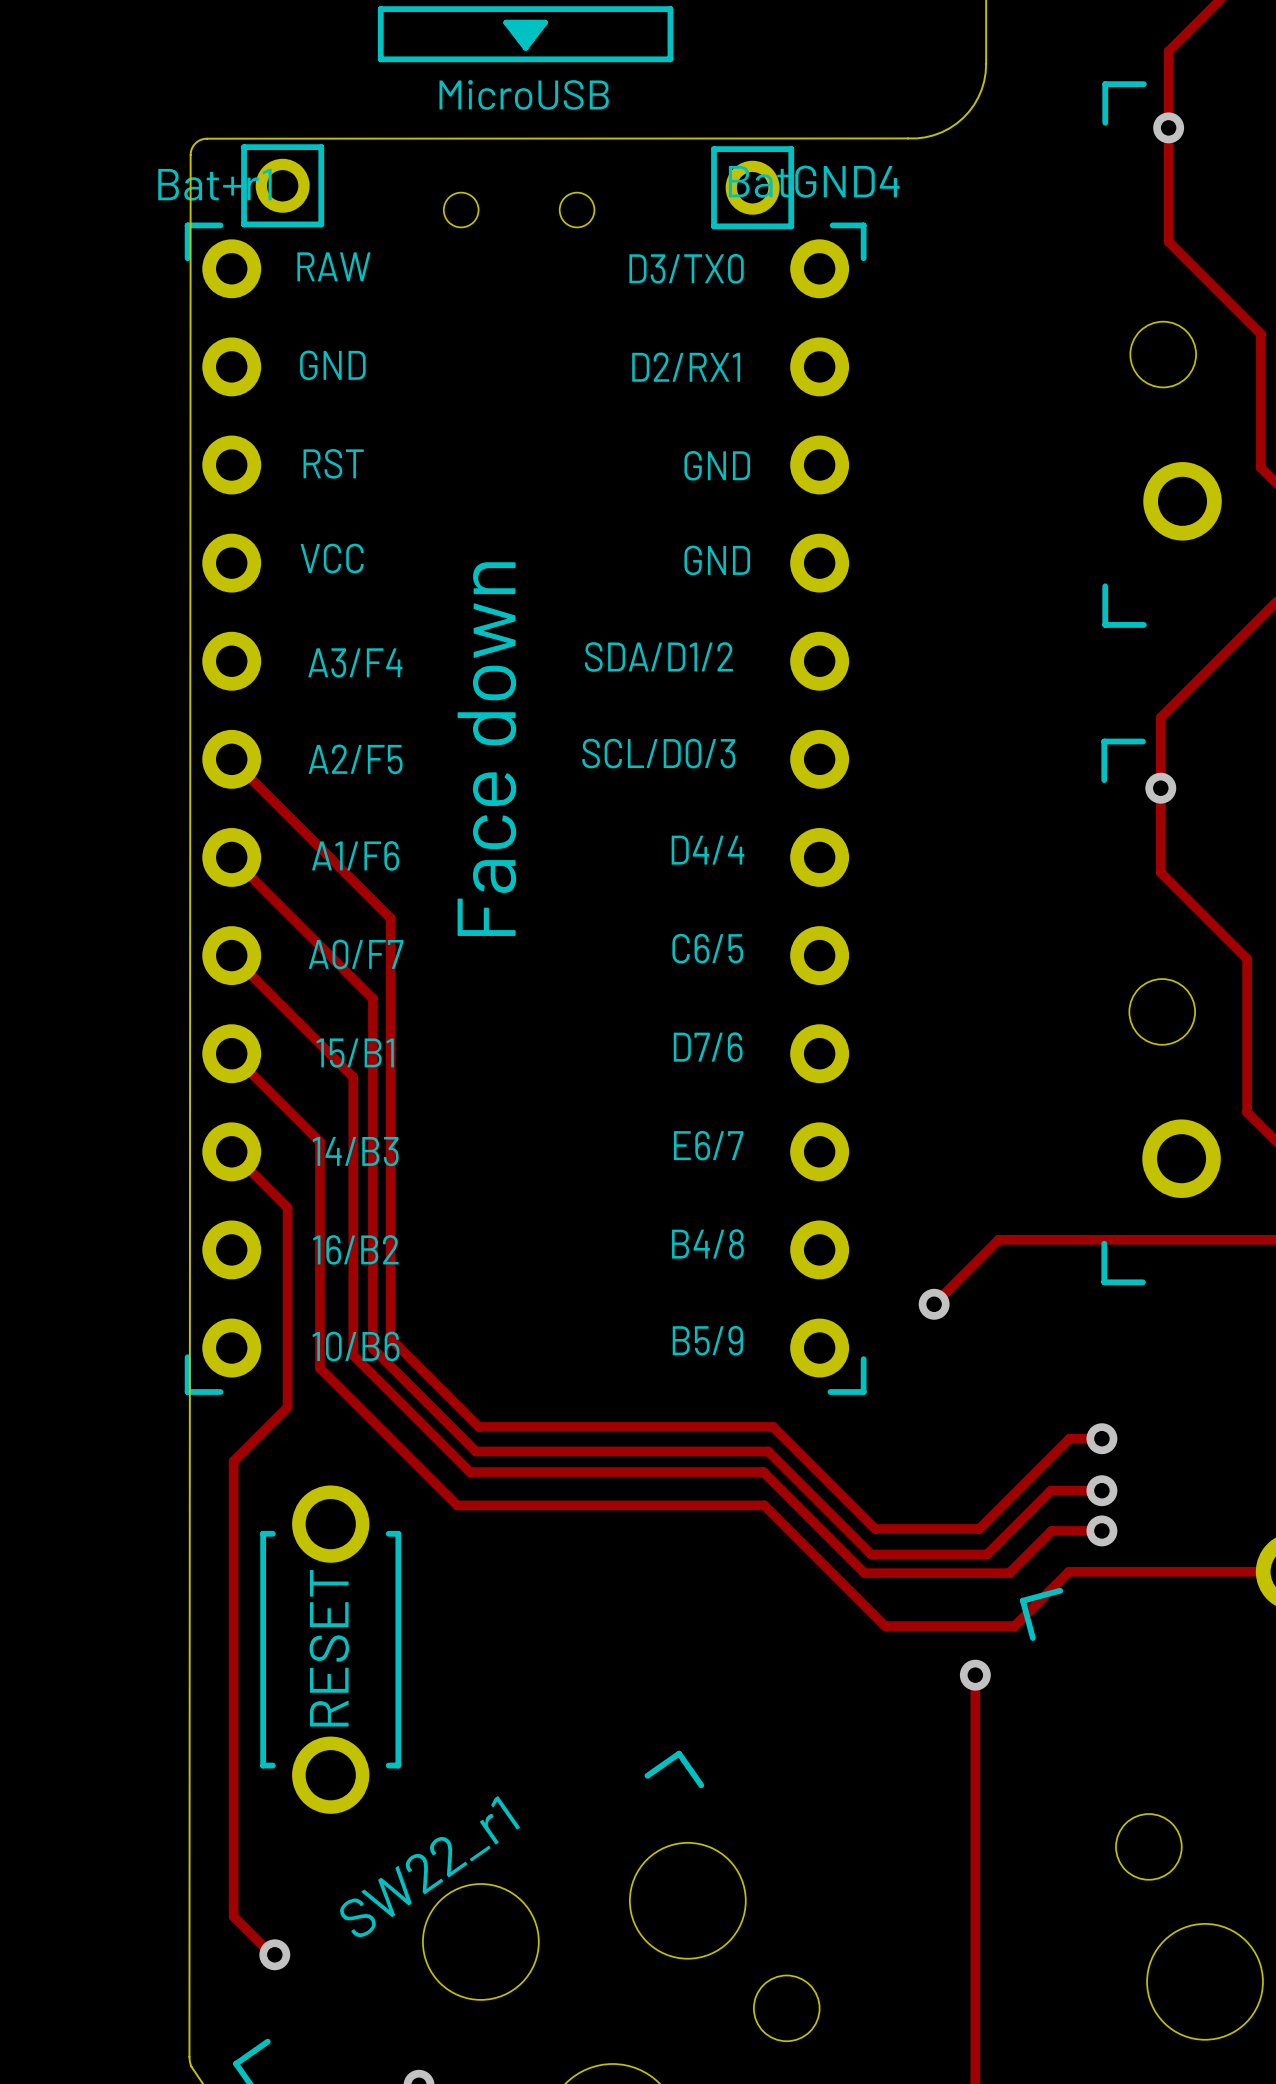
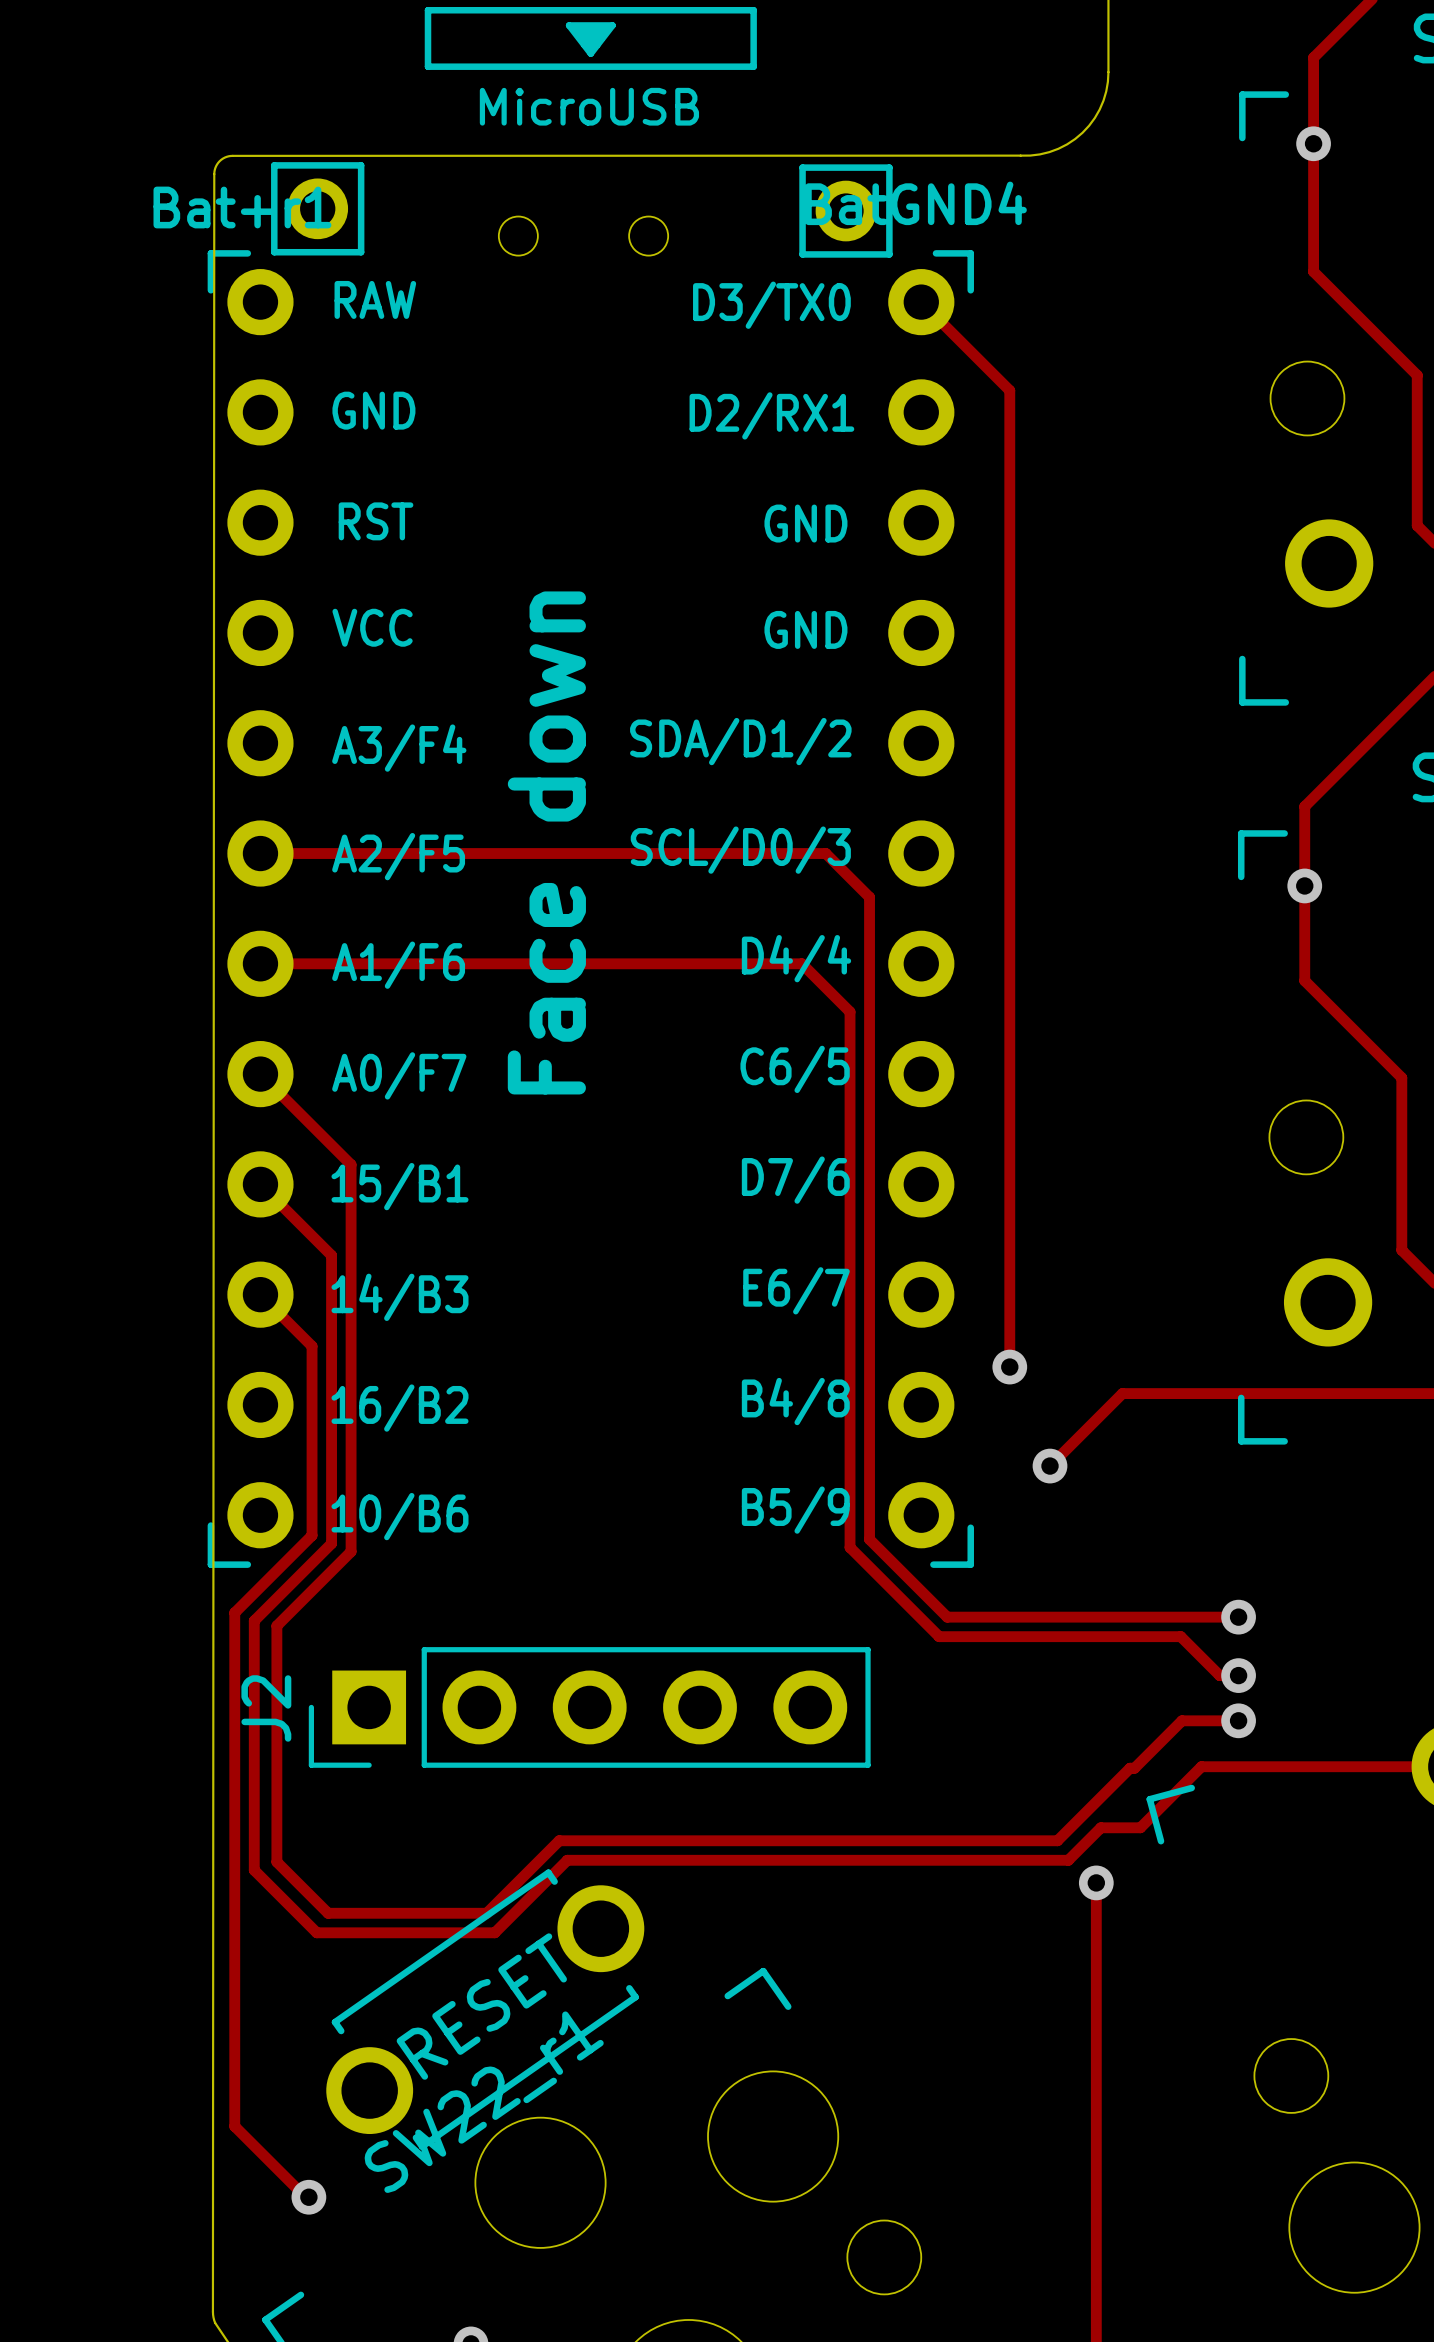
track: none -> (921, 302) (1009, 390) (1009, 1367)
track: (231, 759) (390, 918) (390, 1338) (478, 1426) (773, 1426) (875, 1528) (979, 1528) (1069, 1438) -> (260, 853) (825, 853) (869, 897) (869, 1539) (947, 1617) (1202, 1617)
track: (231, 857) (372, 998) (372, 1348) (475, 1451) (768, 1451) (871, 1554) (987, 1554) (1050, 1490) (1085, 1490) -> (260, 963) (801, 963) (850, 1011) (850, 1547) (939, 1636) (1180, 1636) (1219, 1675)
track: (312, 1036) (353, 1077) (353, 1355) (470, 1472) (763, 1472) (864, 1573) (1005, 1573) -> (351, 1164) (351, 1551) (276, 1625) (276, 1862) (328, 1913) (486, 1913) (559, 1840) (1057, 1840) (1130, 1768)
track: (294, 1116) (319, 1141) (319, 1368) (457, 1505) (764, 1505) (885, 1626) (979, 1626) -> (331, 1255) (331, 1543) (254, 1620) (254, 1870) (316, 1932) (494, 1932) (567, 1860) (1068, 1860) (1100, 1827)
track: (277, 1197) (287, 1207) (287, 1407) (233, 1461) (233, 1916) -> (312, 1346) (312, 1535) (234, 1612) (234, 2126) (262, 2154)
via: none -> (1009, 1367)
J2: none -> (589, 1707)
part: (330, 1649) -> none
part: none -> (485, 2009)

